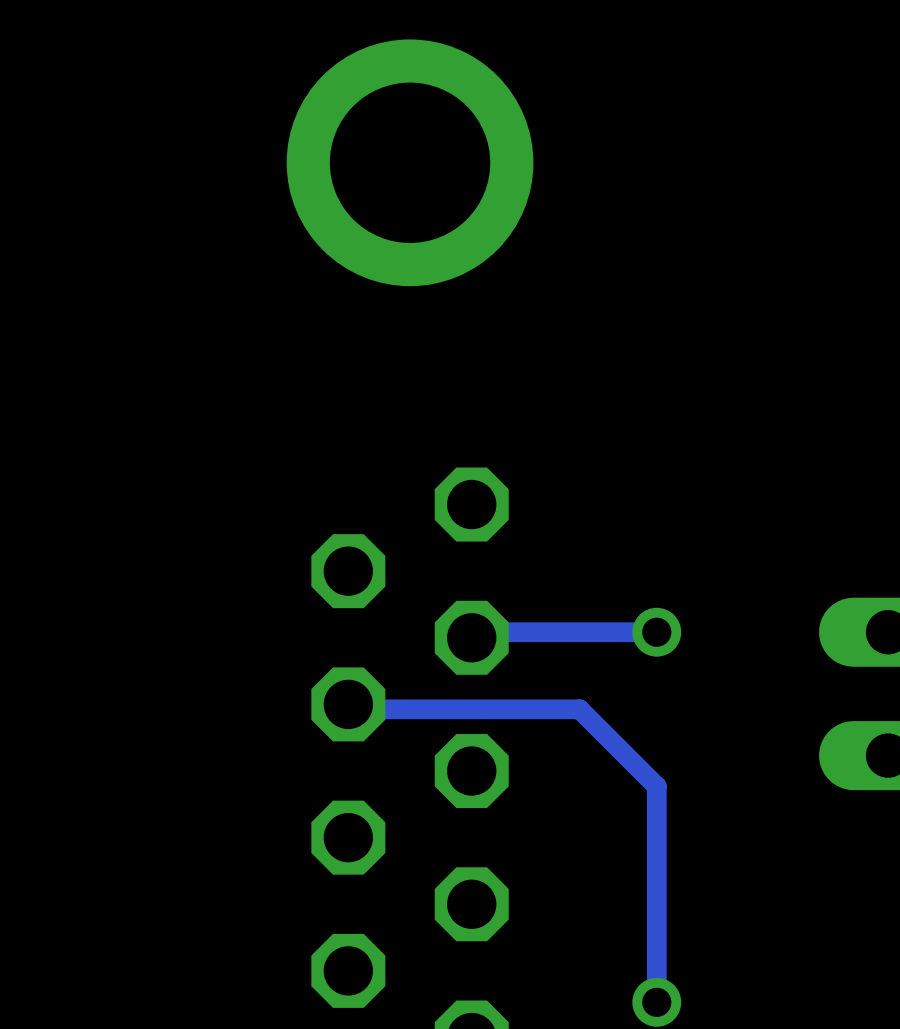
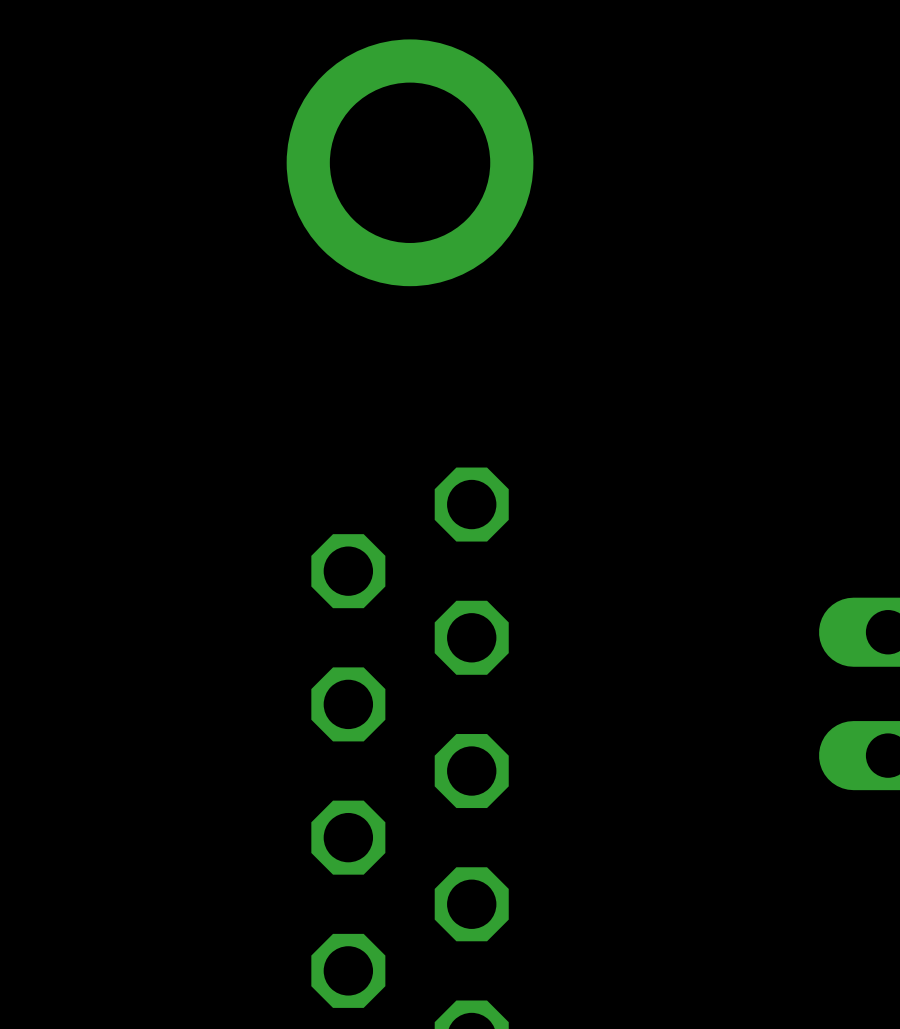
track: (656, 632) (477, 632) (471, 637) -> none
via: (656, 632) -> none
track: (348, 704) (353, 709) (579, 709) (656, 786) (656, 1002) -> none
via: (656, 1002) -> none

